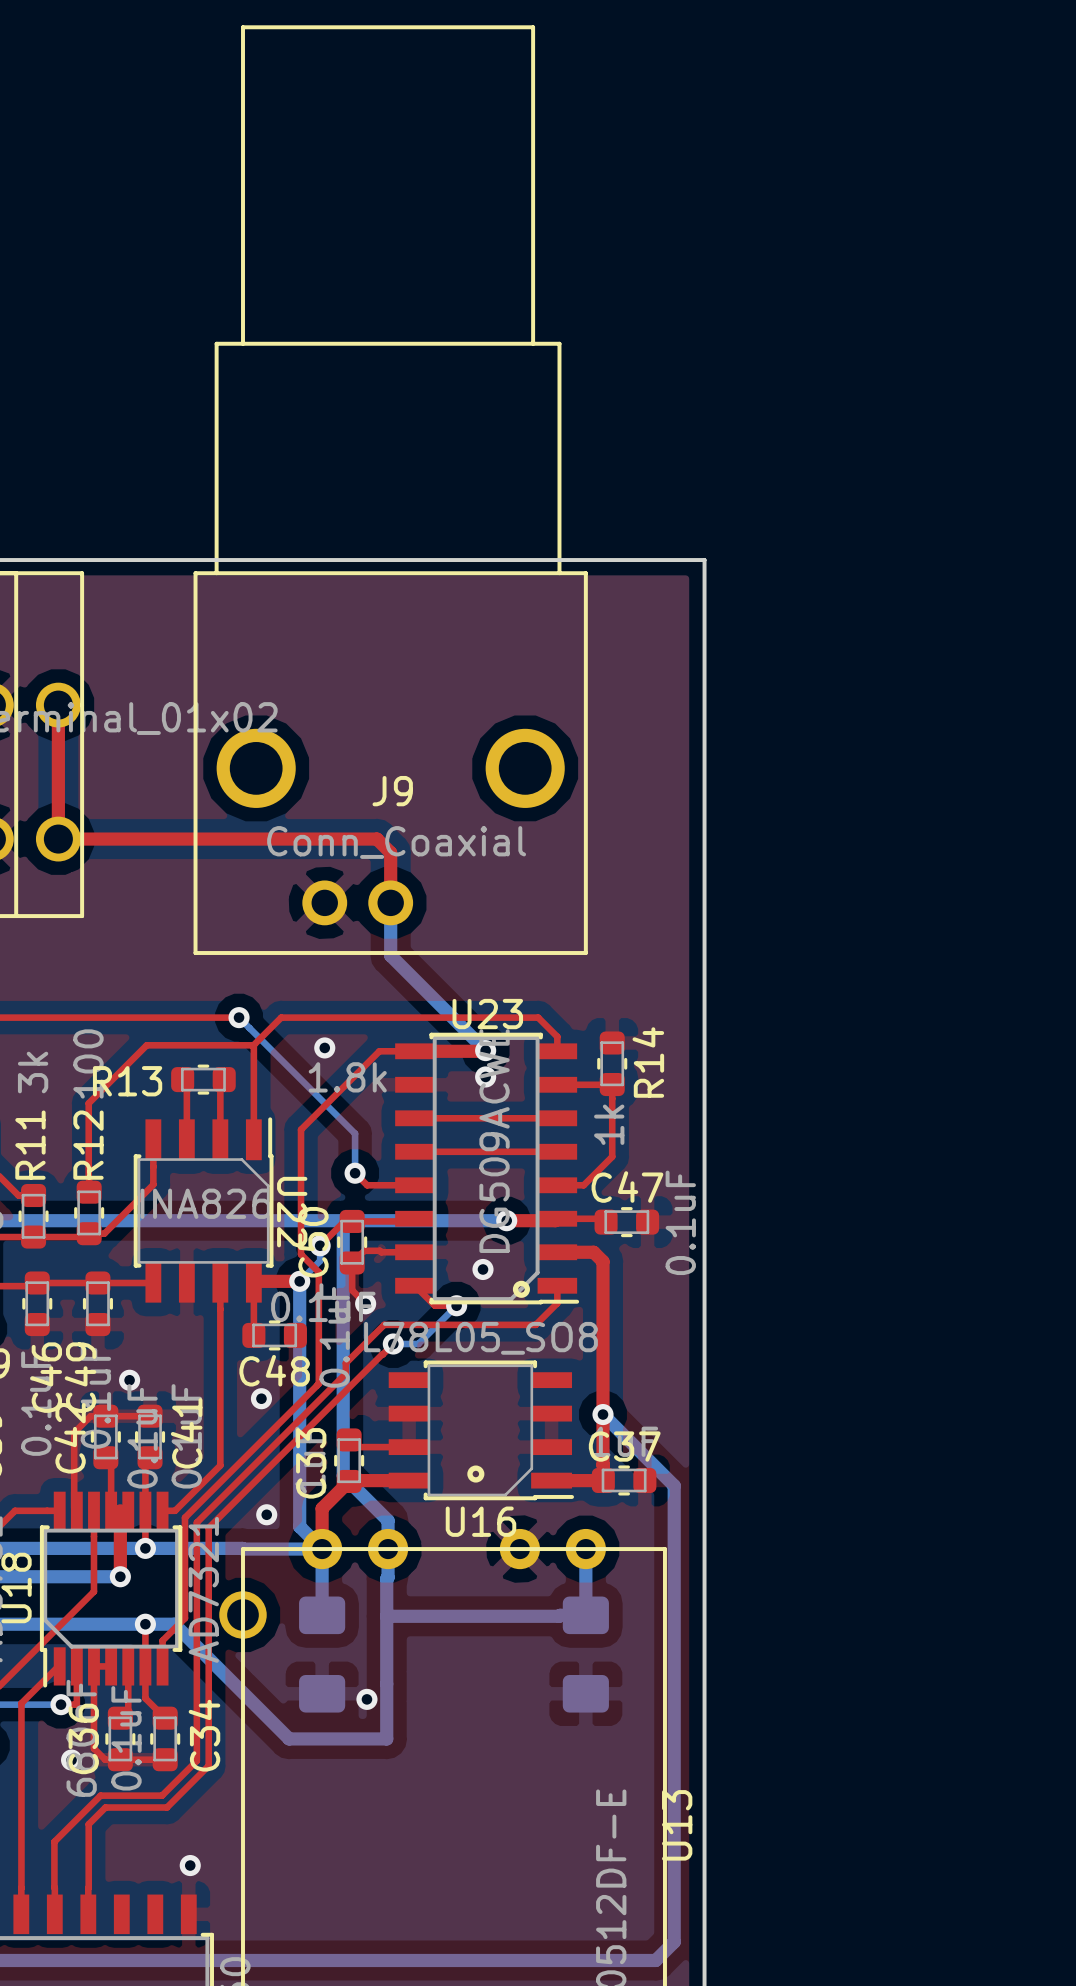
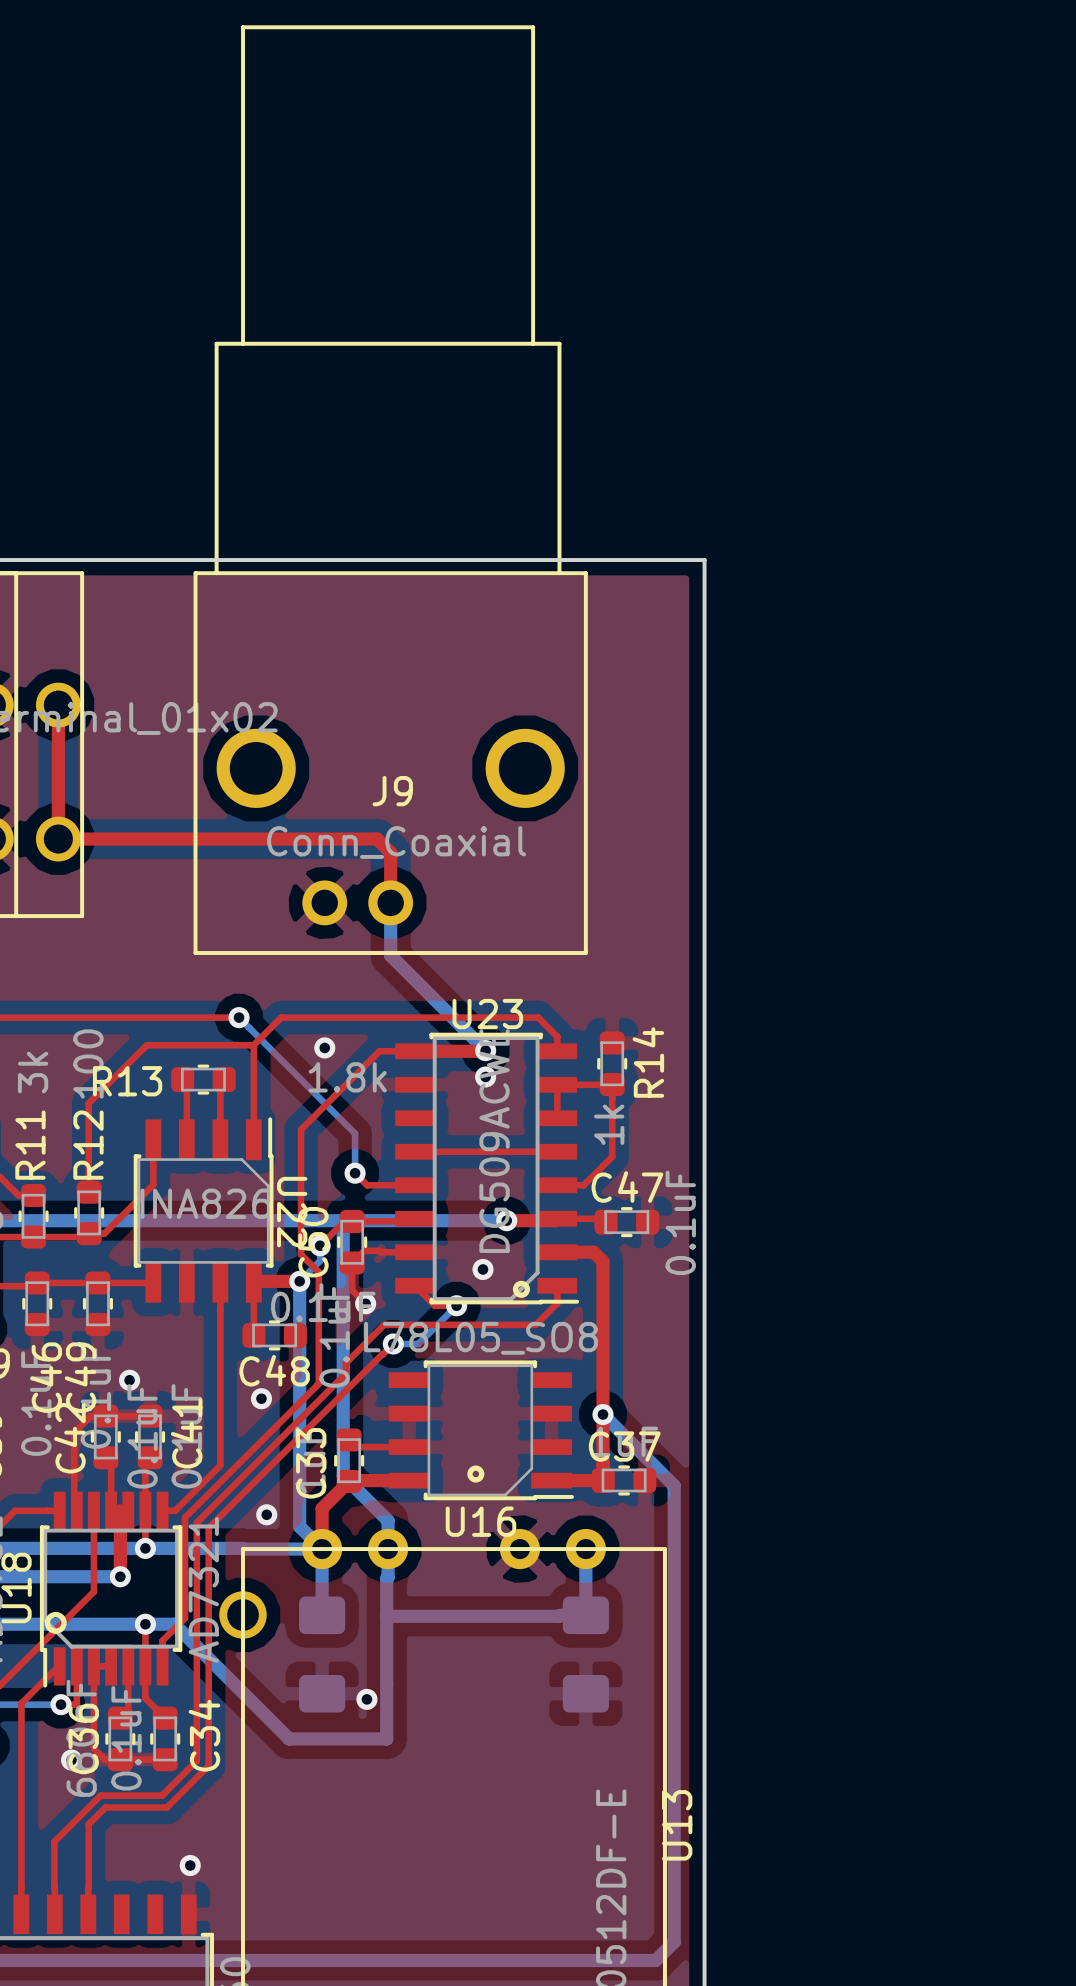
top track: (414, 1118) (557, 1118) -> (557, 1084) (557, 1118)
drawing: none -> [44, 1611, 67, 1634]

